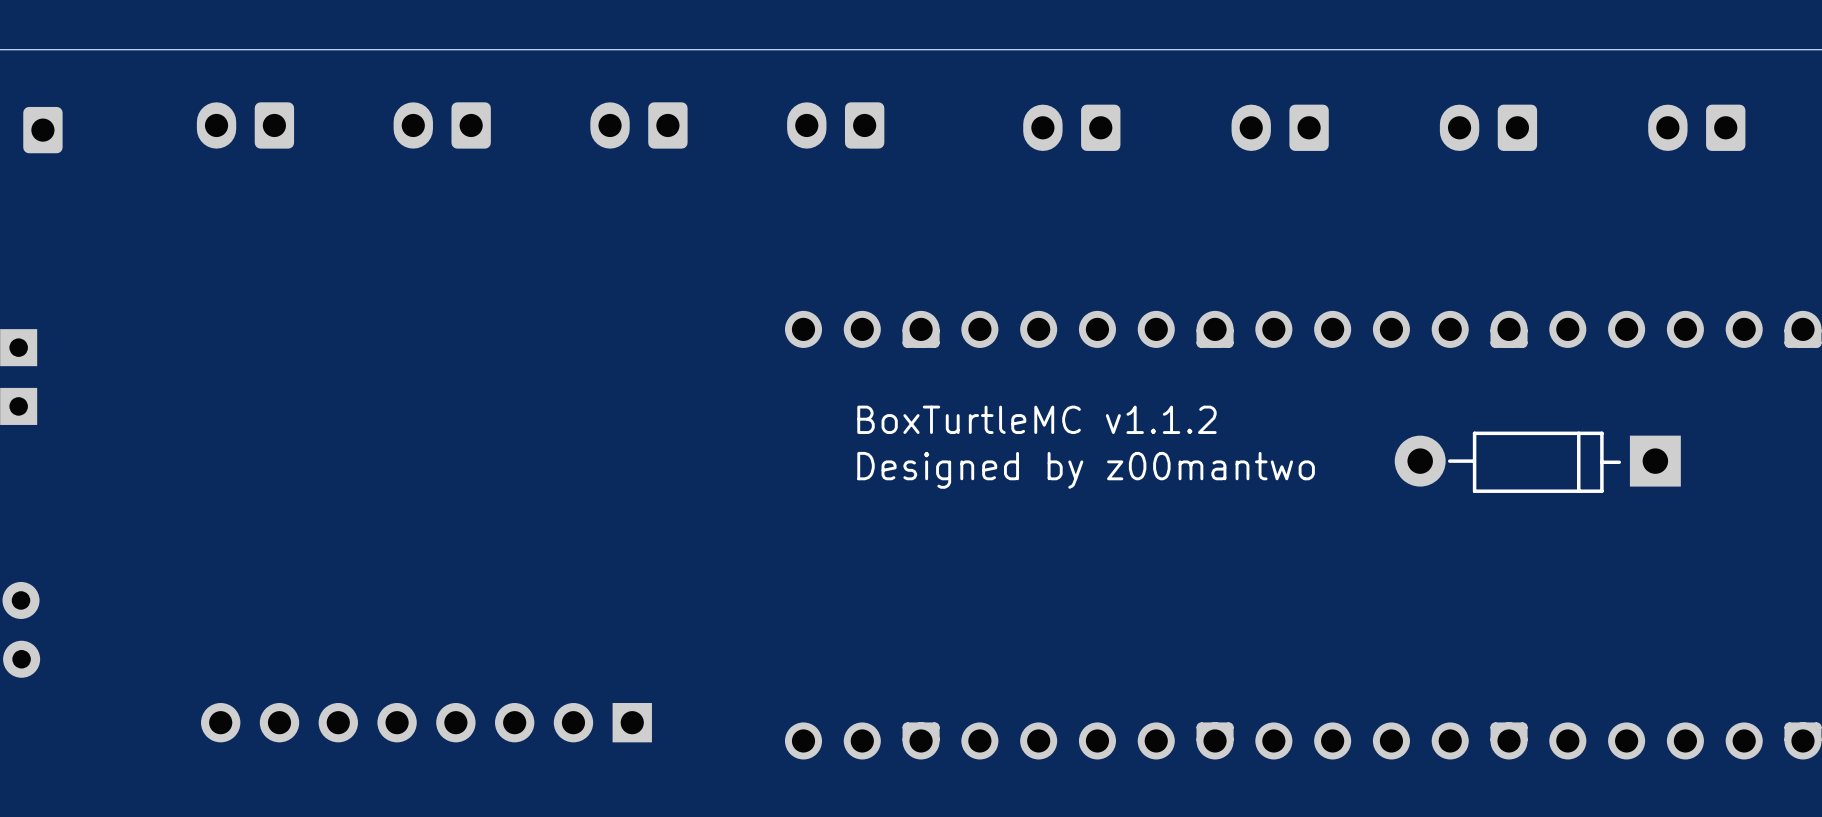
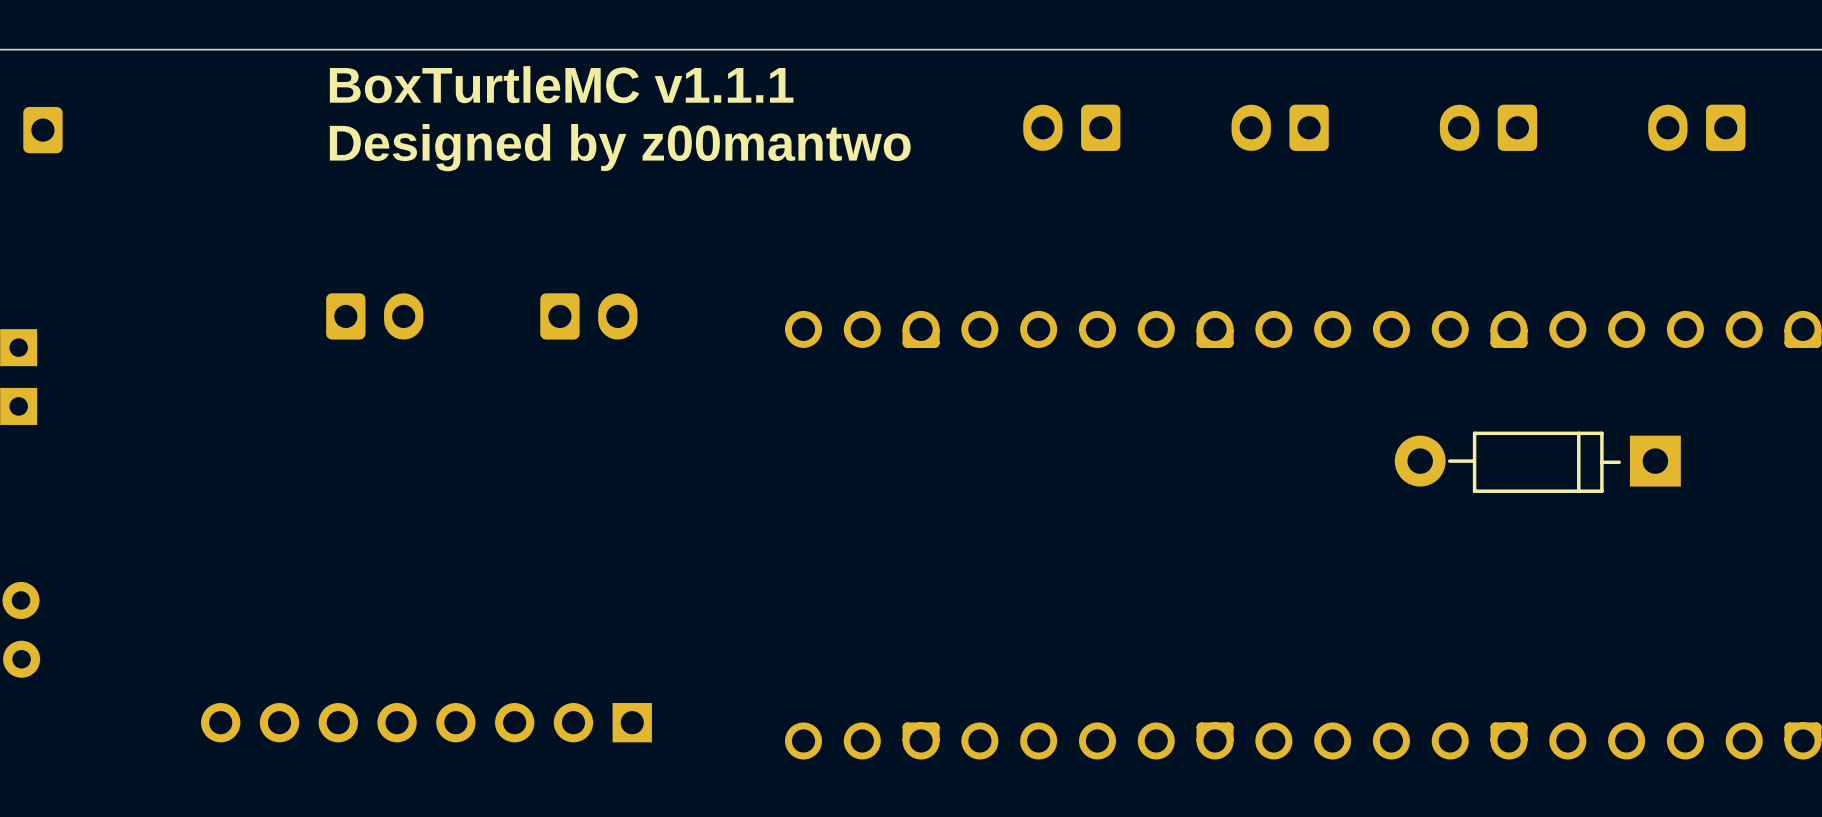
text: none -> BoxTurtleMC v1.1.1 (561, 84)
part: (245, 125) -> none
part: (442, 125) -> none
part: (638, 125) -> none
part: (835, 125) -> none
text: none -> Designed by z00mantwo (620, 147)
part: none -> (374, 316)
part: none -> (588, 316)
text: BoxTurtleMC v1.1.2 (1036, 419) -> none
text: Designed by z00mantwo (1086, 470) -> none

